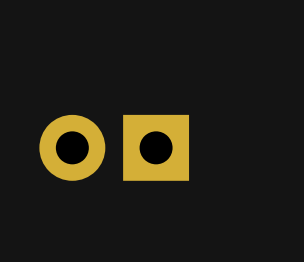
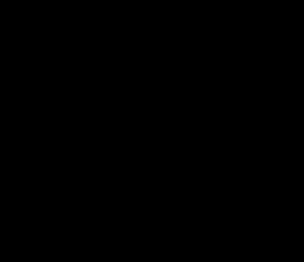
part: (114, 147) -> none

